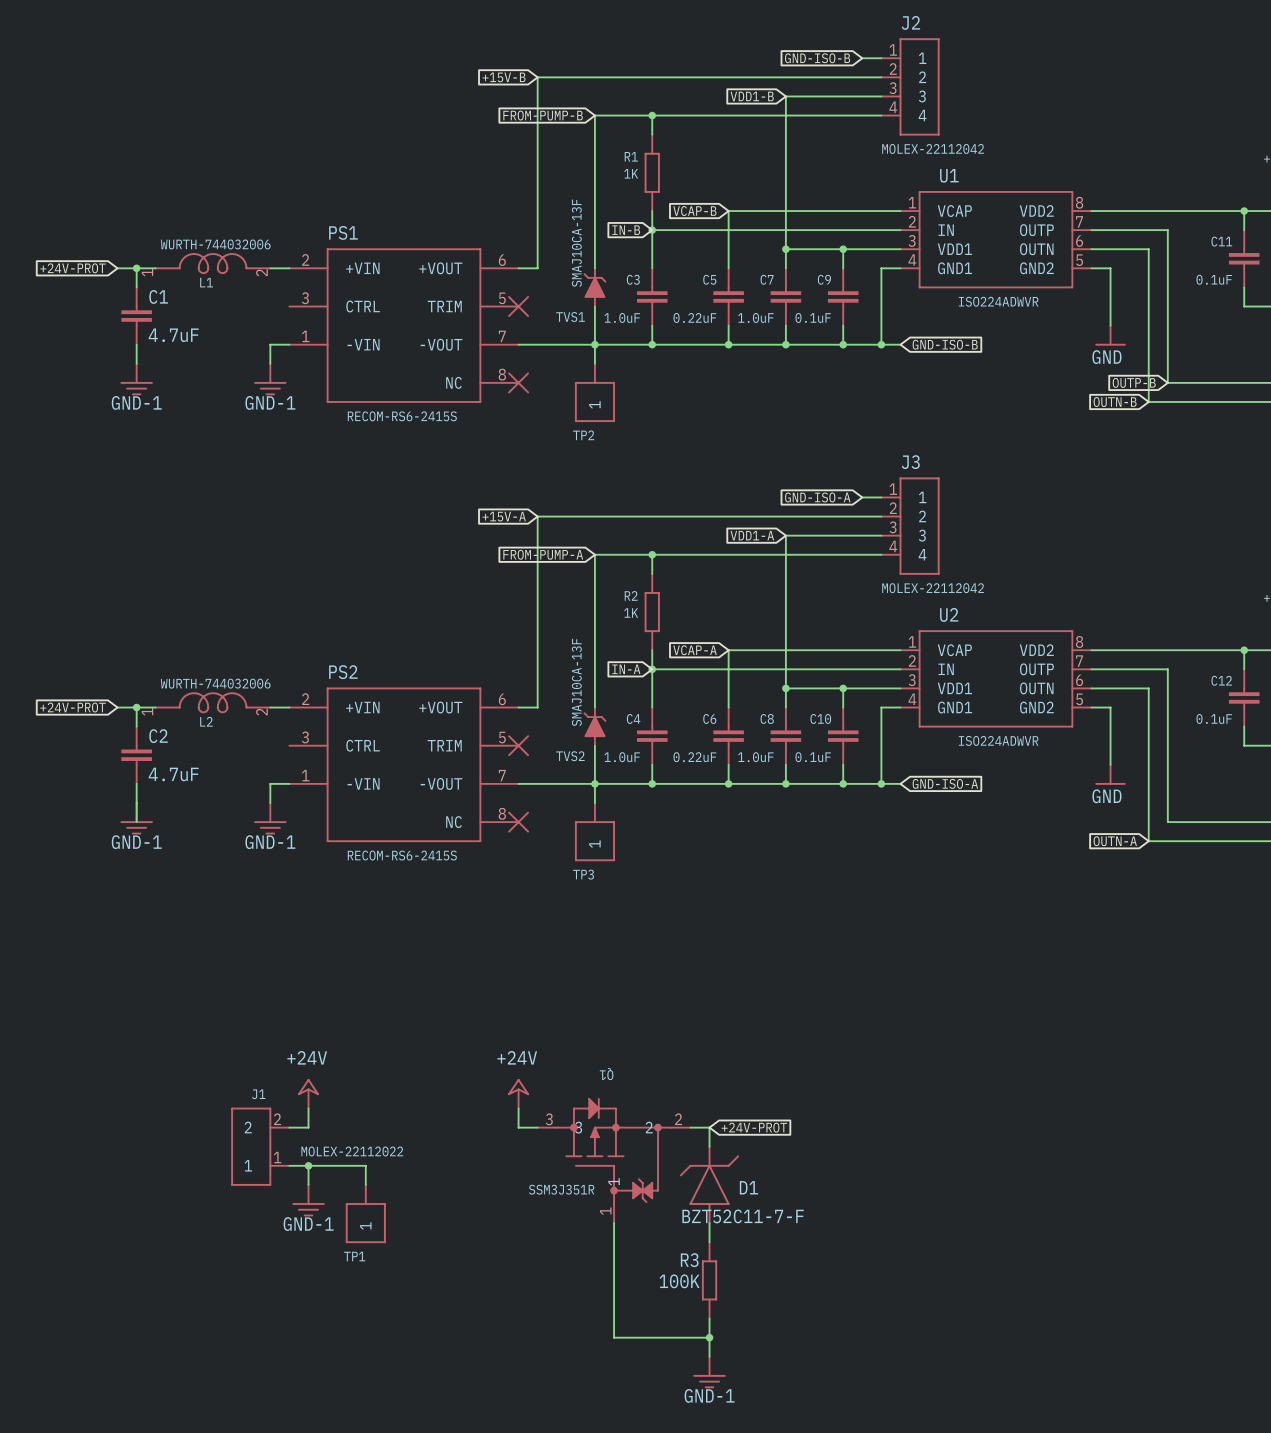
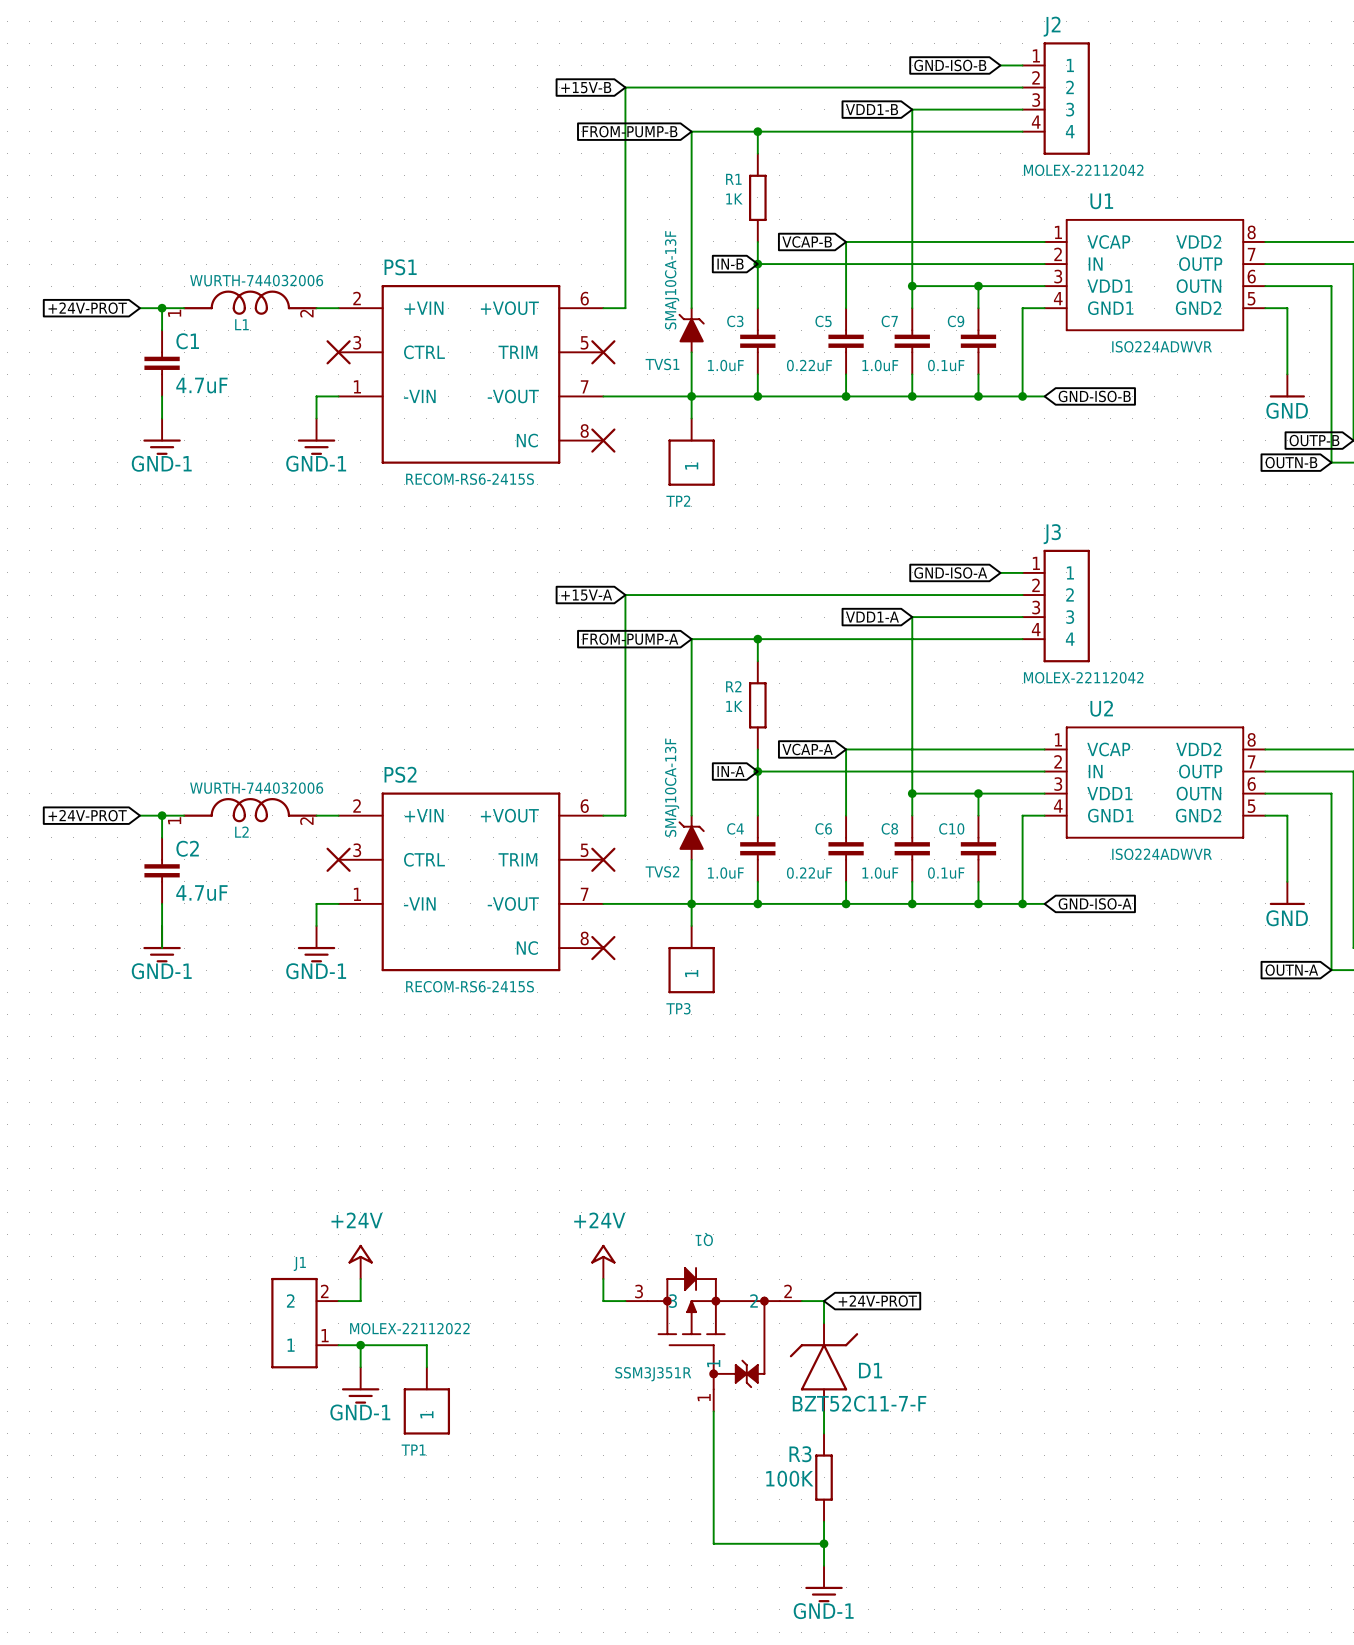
part: none -> (338, 352)
part: none -> (338, 859)

